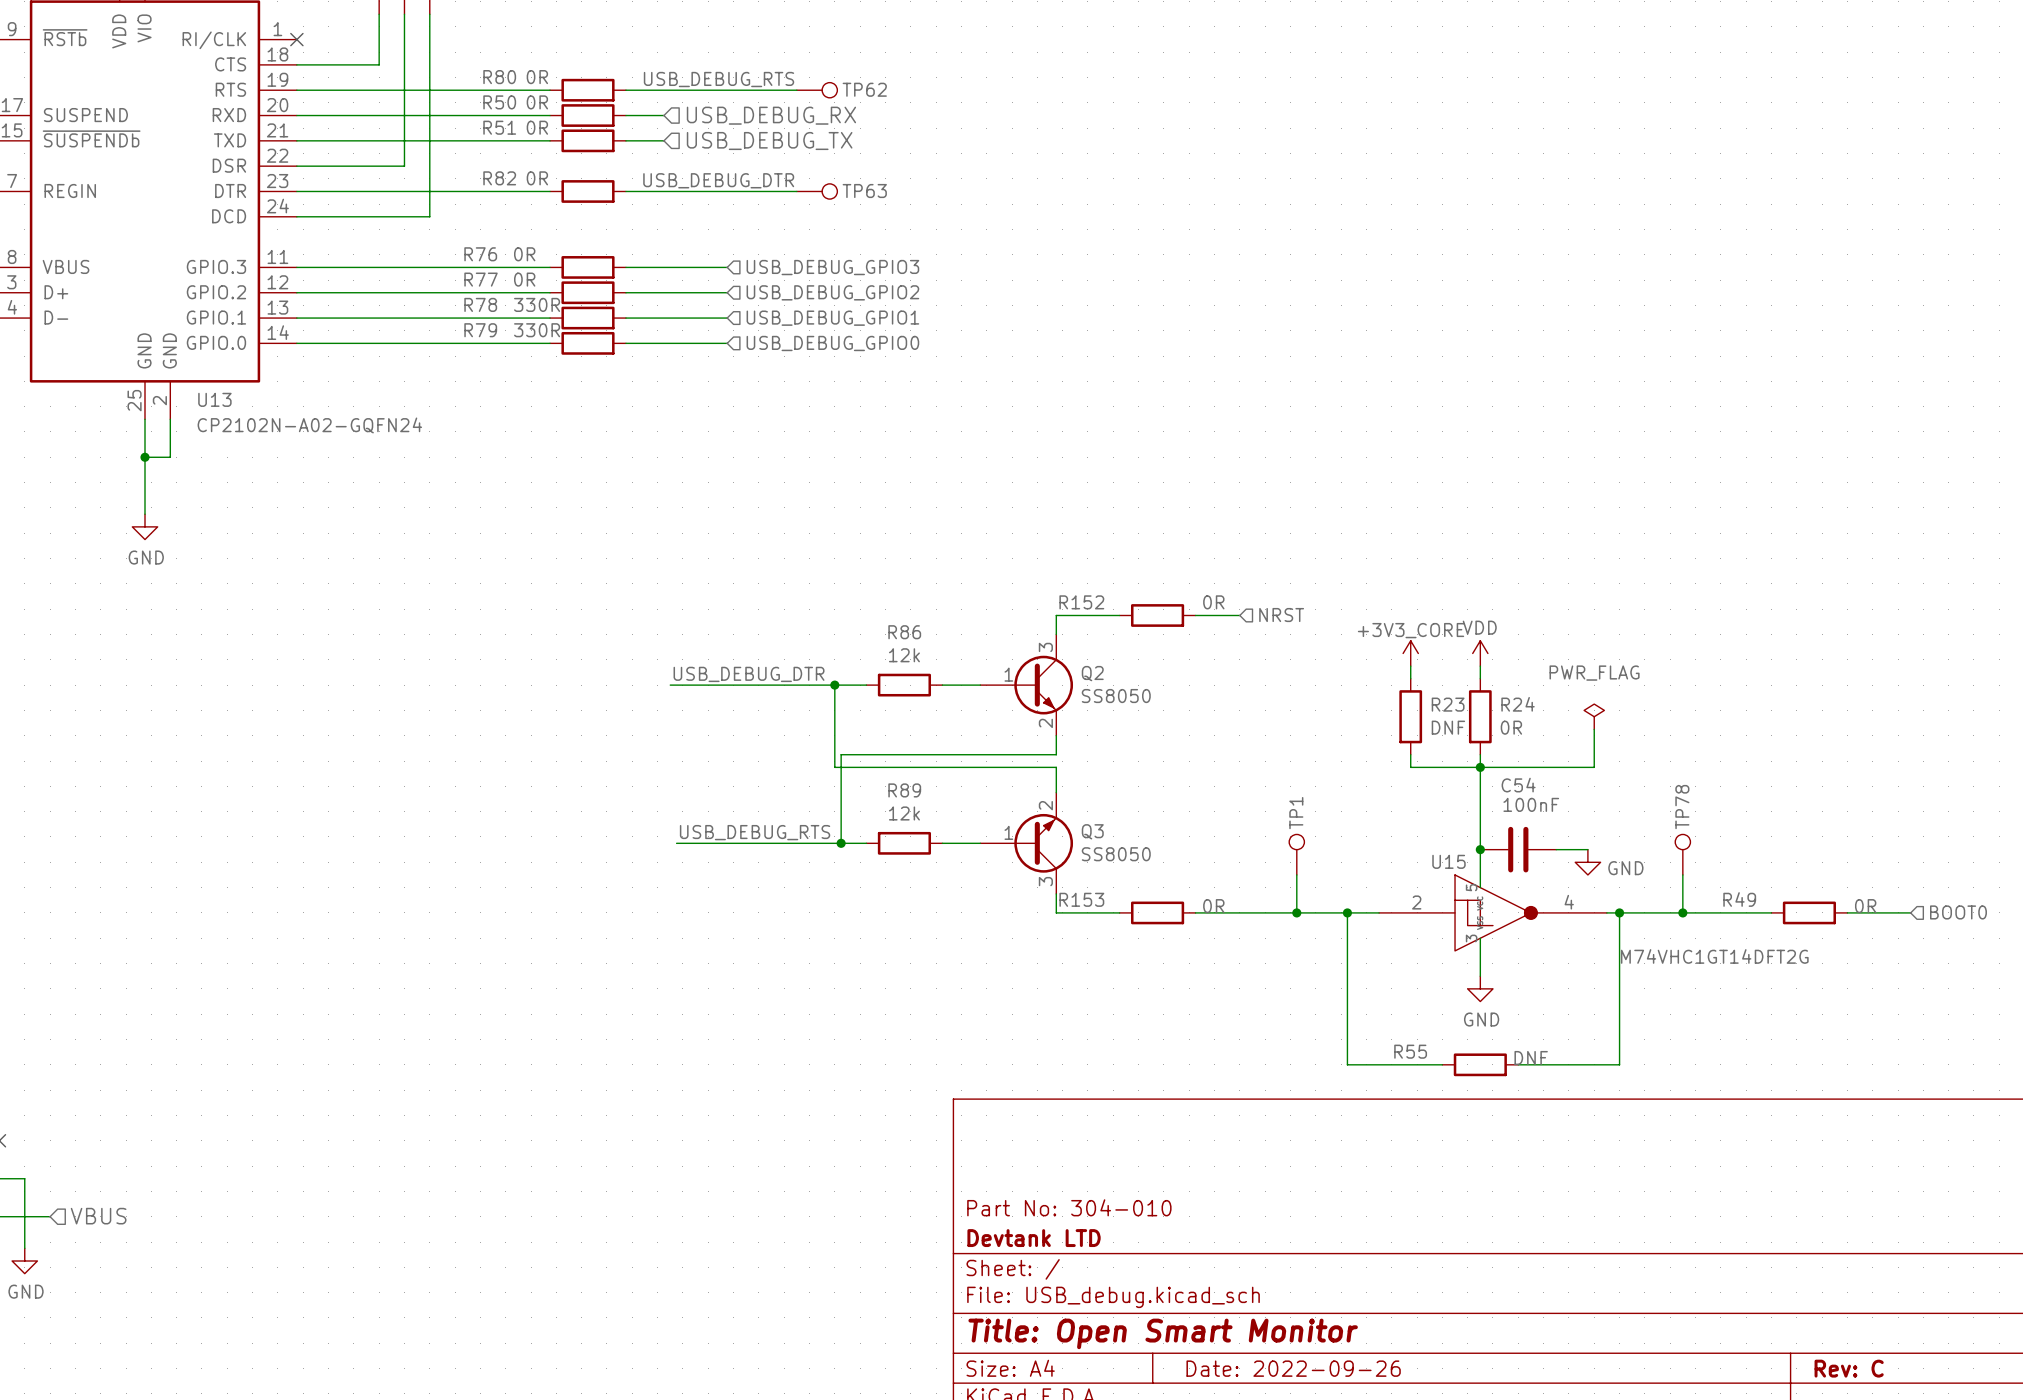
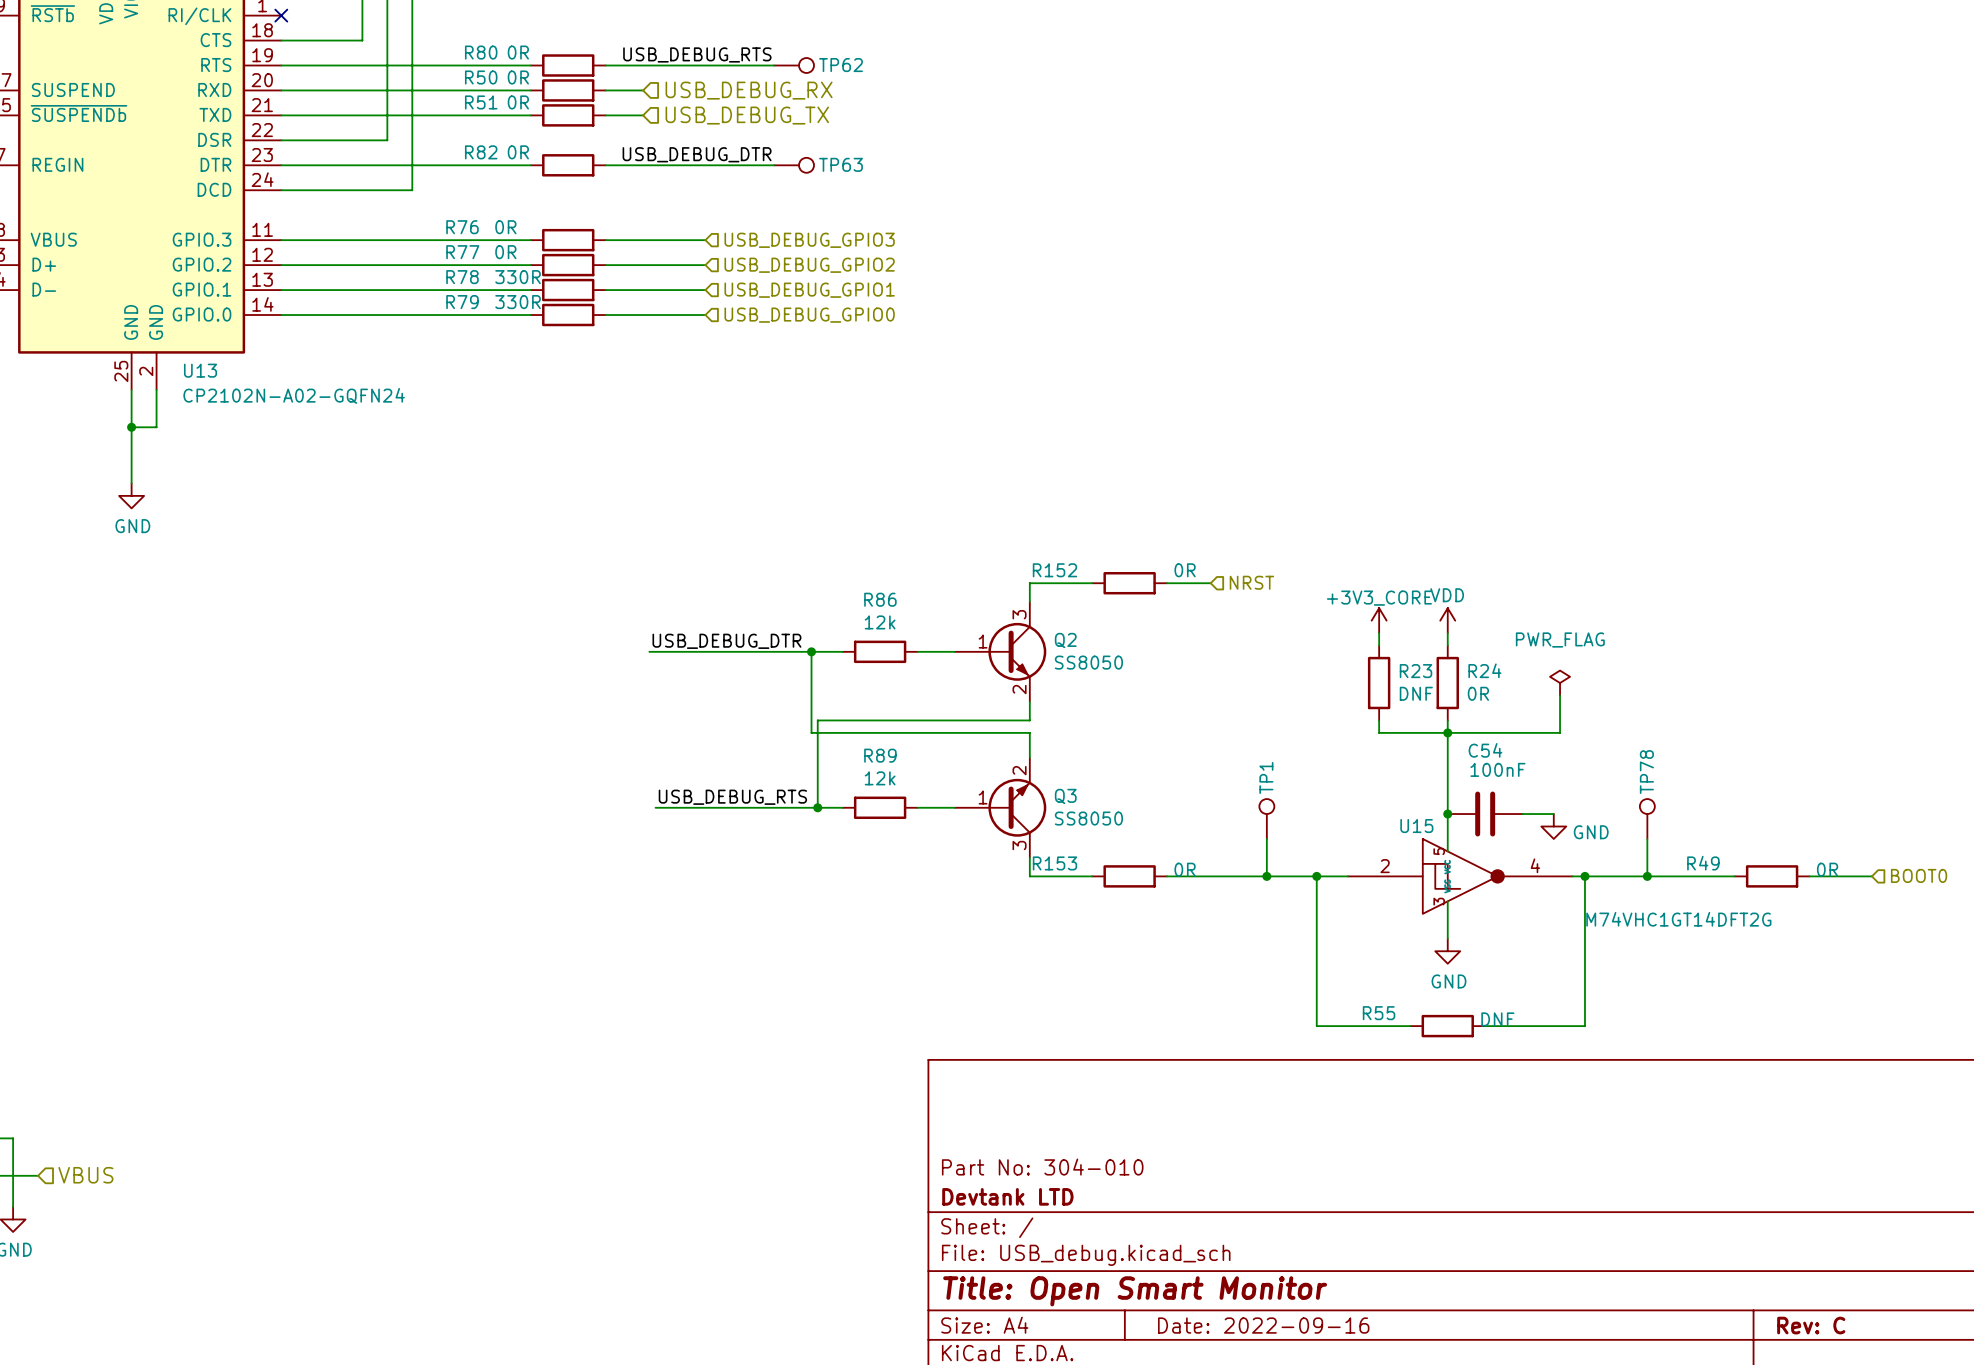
title block: Date: 2022-09-26 (1293, 1368) -> Date: 2022-09-16 (1263, 1325)

